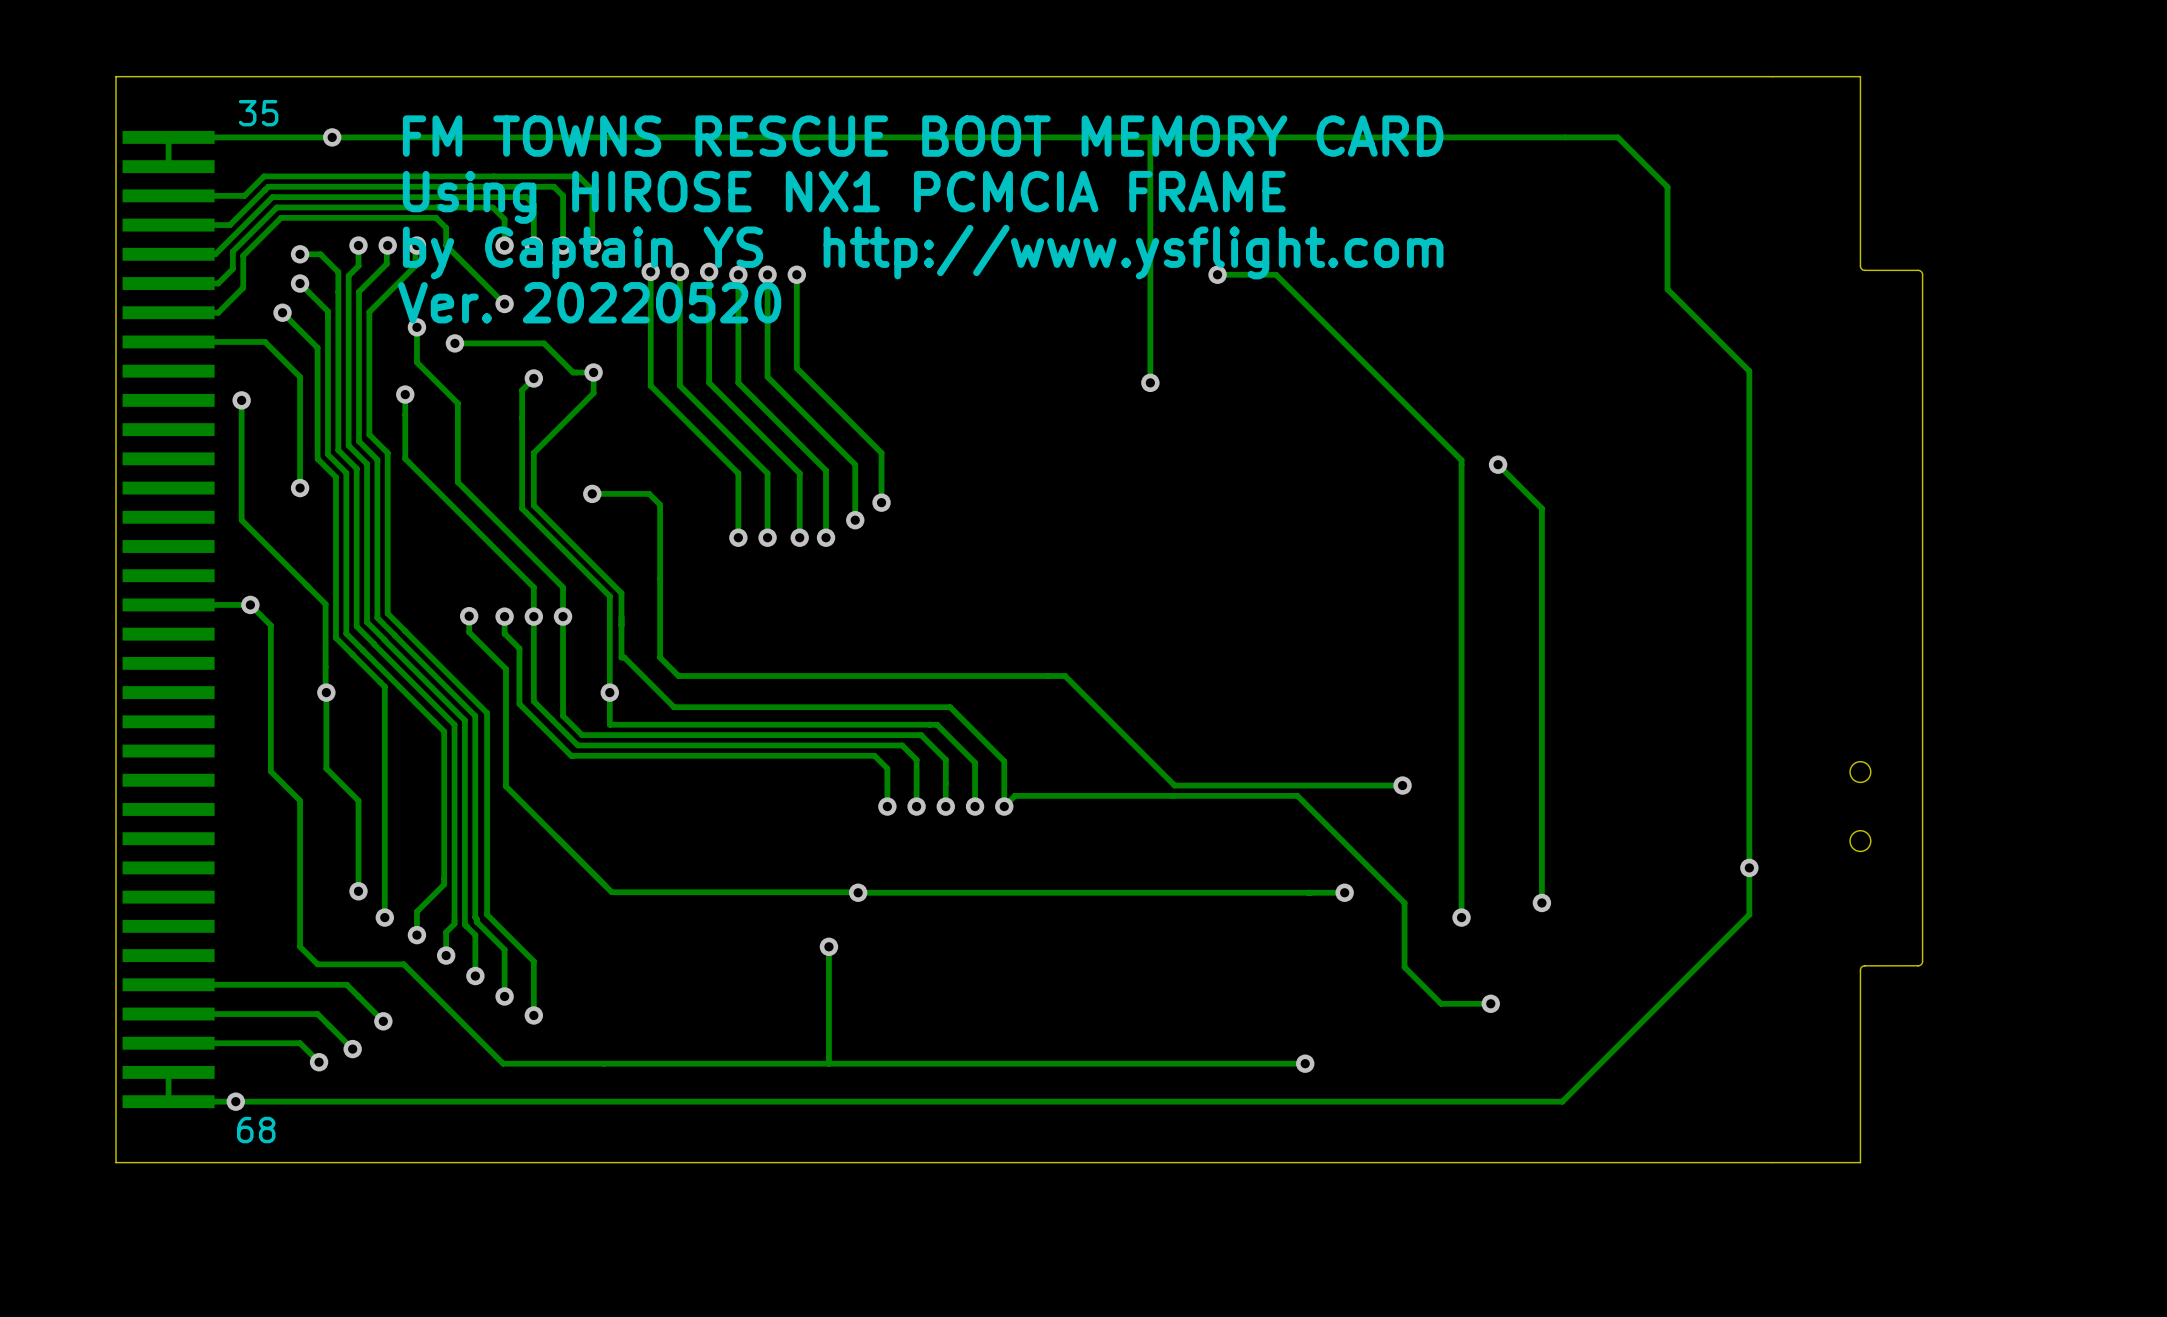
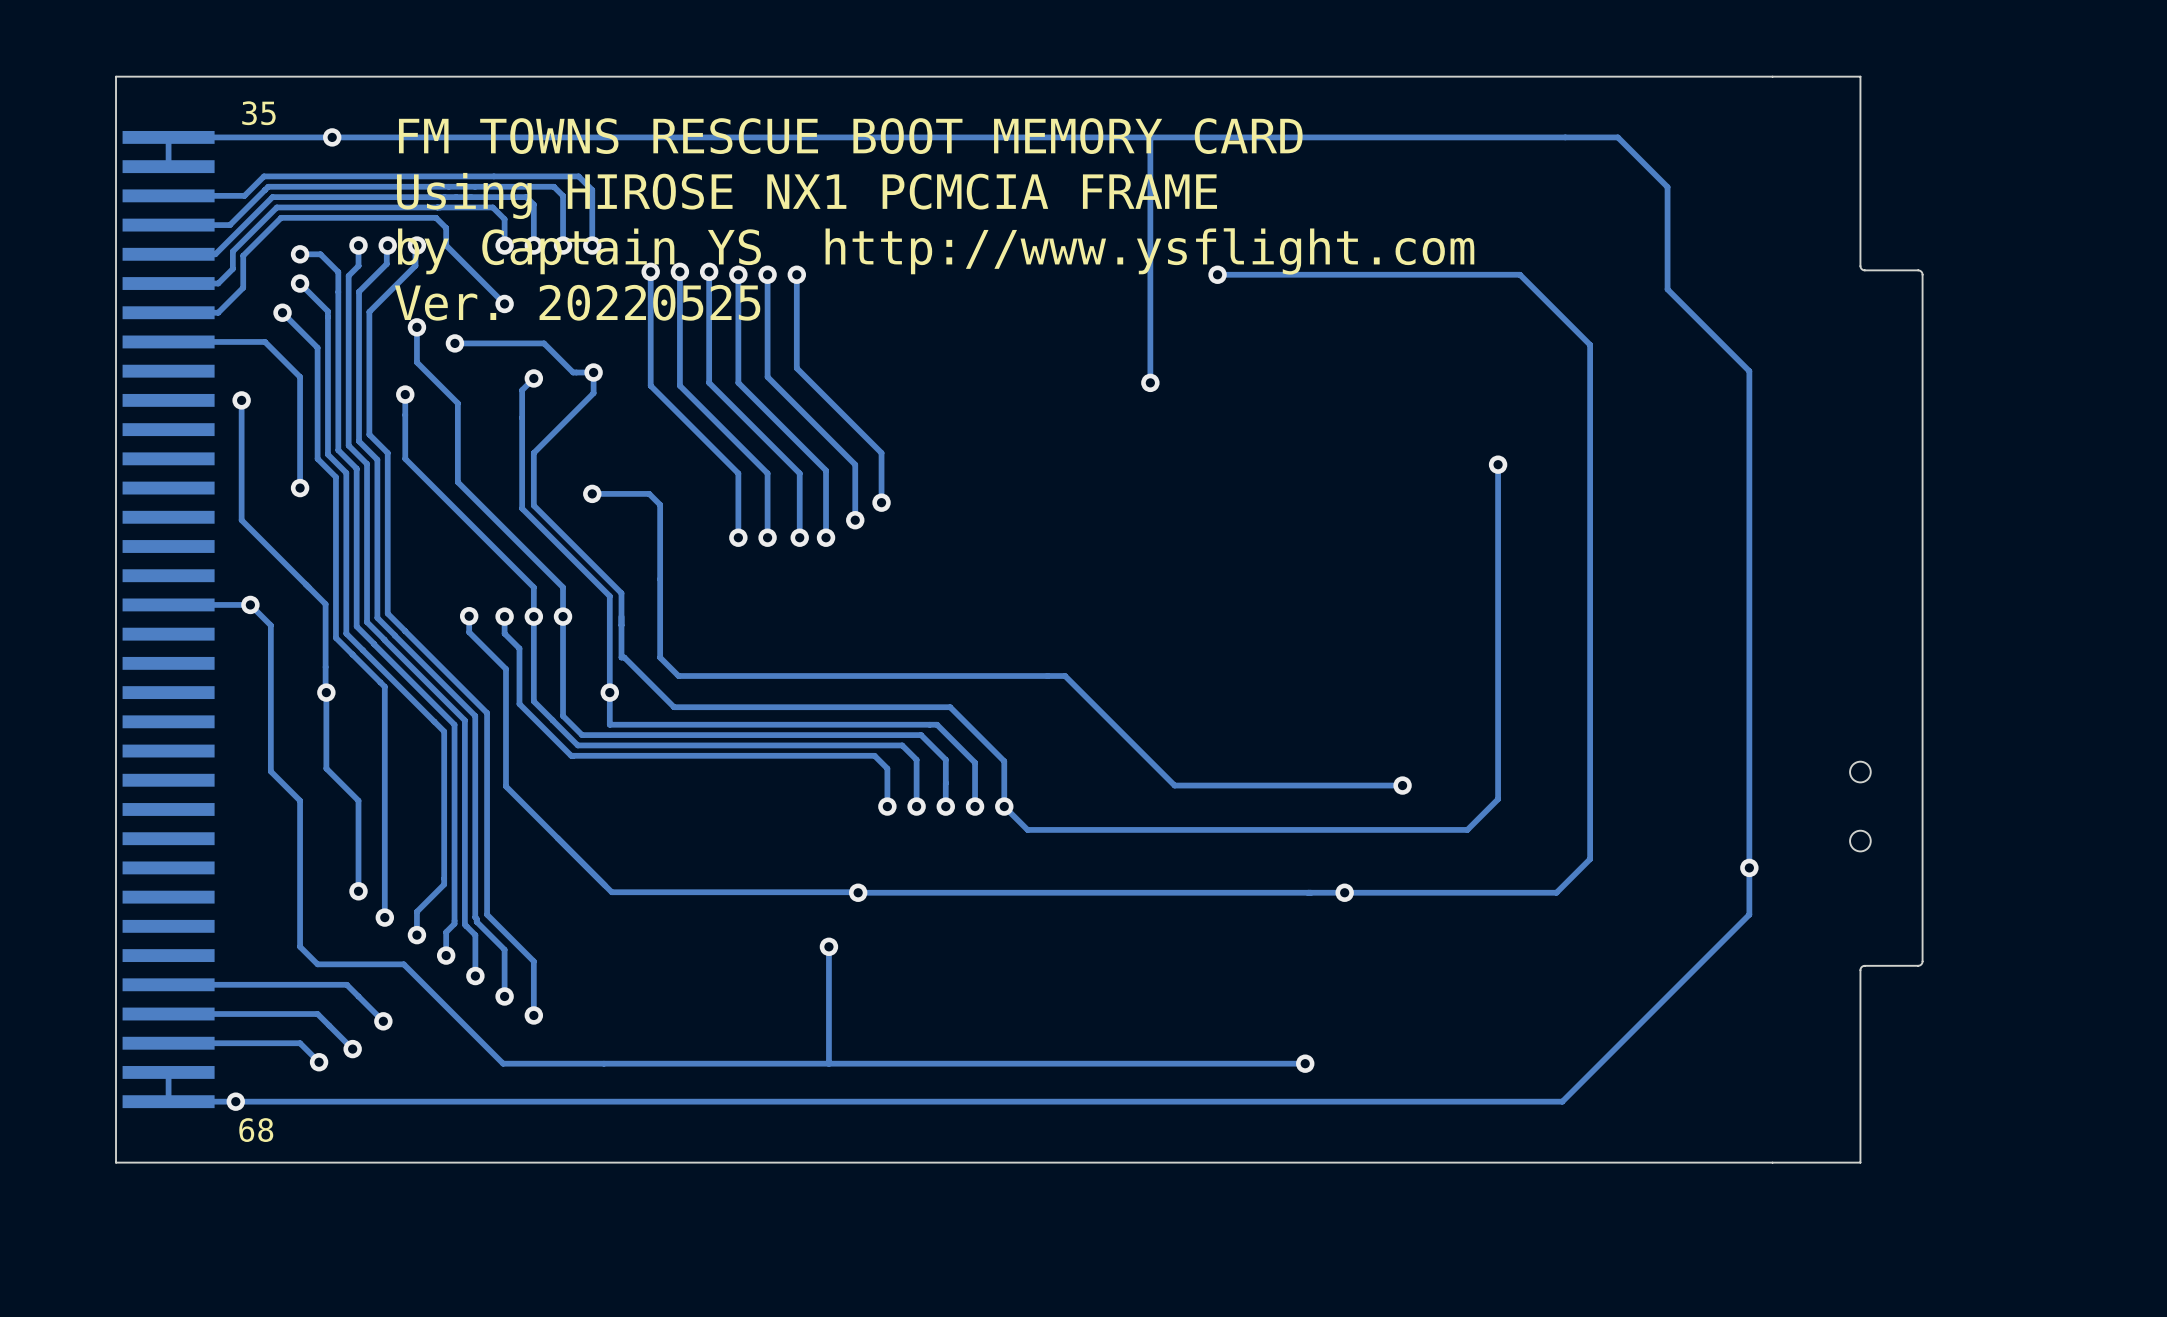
track: (1276, 274) (1461, 460) (1461, 917) -> (1276, 274) (1519, 274) (1590, 344) (1590, 859) (1556, 892) (1344, 892)
text: Ver. 20220520 (589, 302) -> Ver. 20220525 (577, 302)
track: (1498, 464) (1541, 508) (1541, 902) -> none
track: (1004, 806) (1014, 795) (1297, 795) (1404, 902) (1404, 967) (1441, 1003) (1490, 1003) -> (1004, 806) (1027, 829) (1467, 829) (1498, 799) (1498, 464)
via: (1541, 902) -> none
via: (1461, 917) -> none
via: (1490, 1003) -> none

